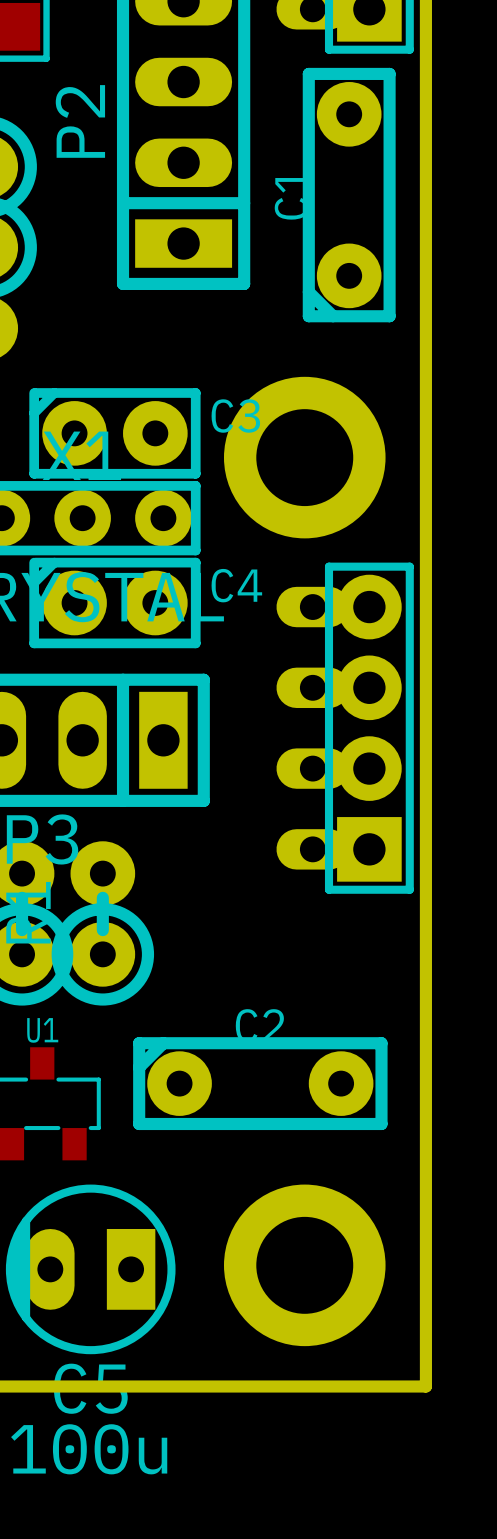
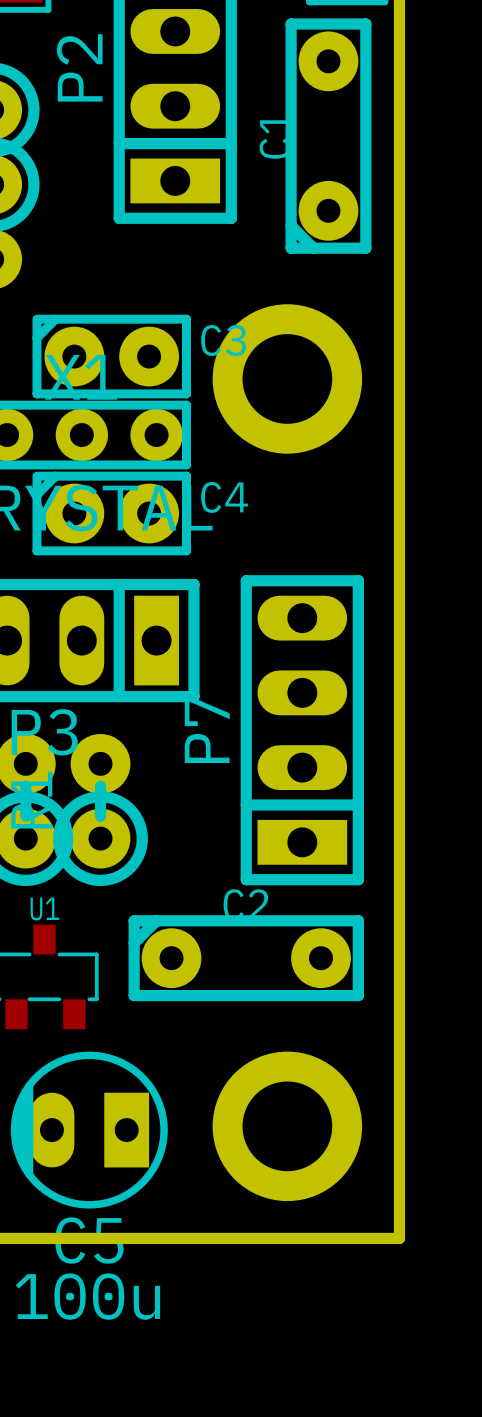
part: (345, 728) -> none
P7: none -> (302, 730)

